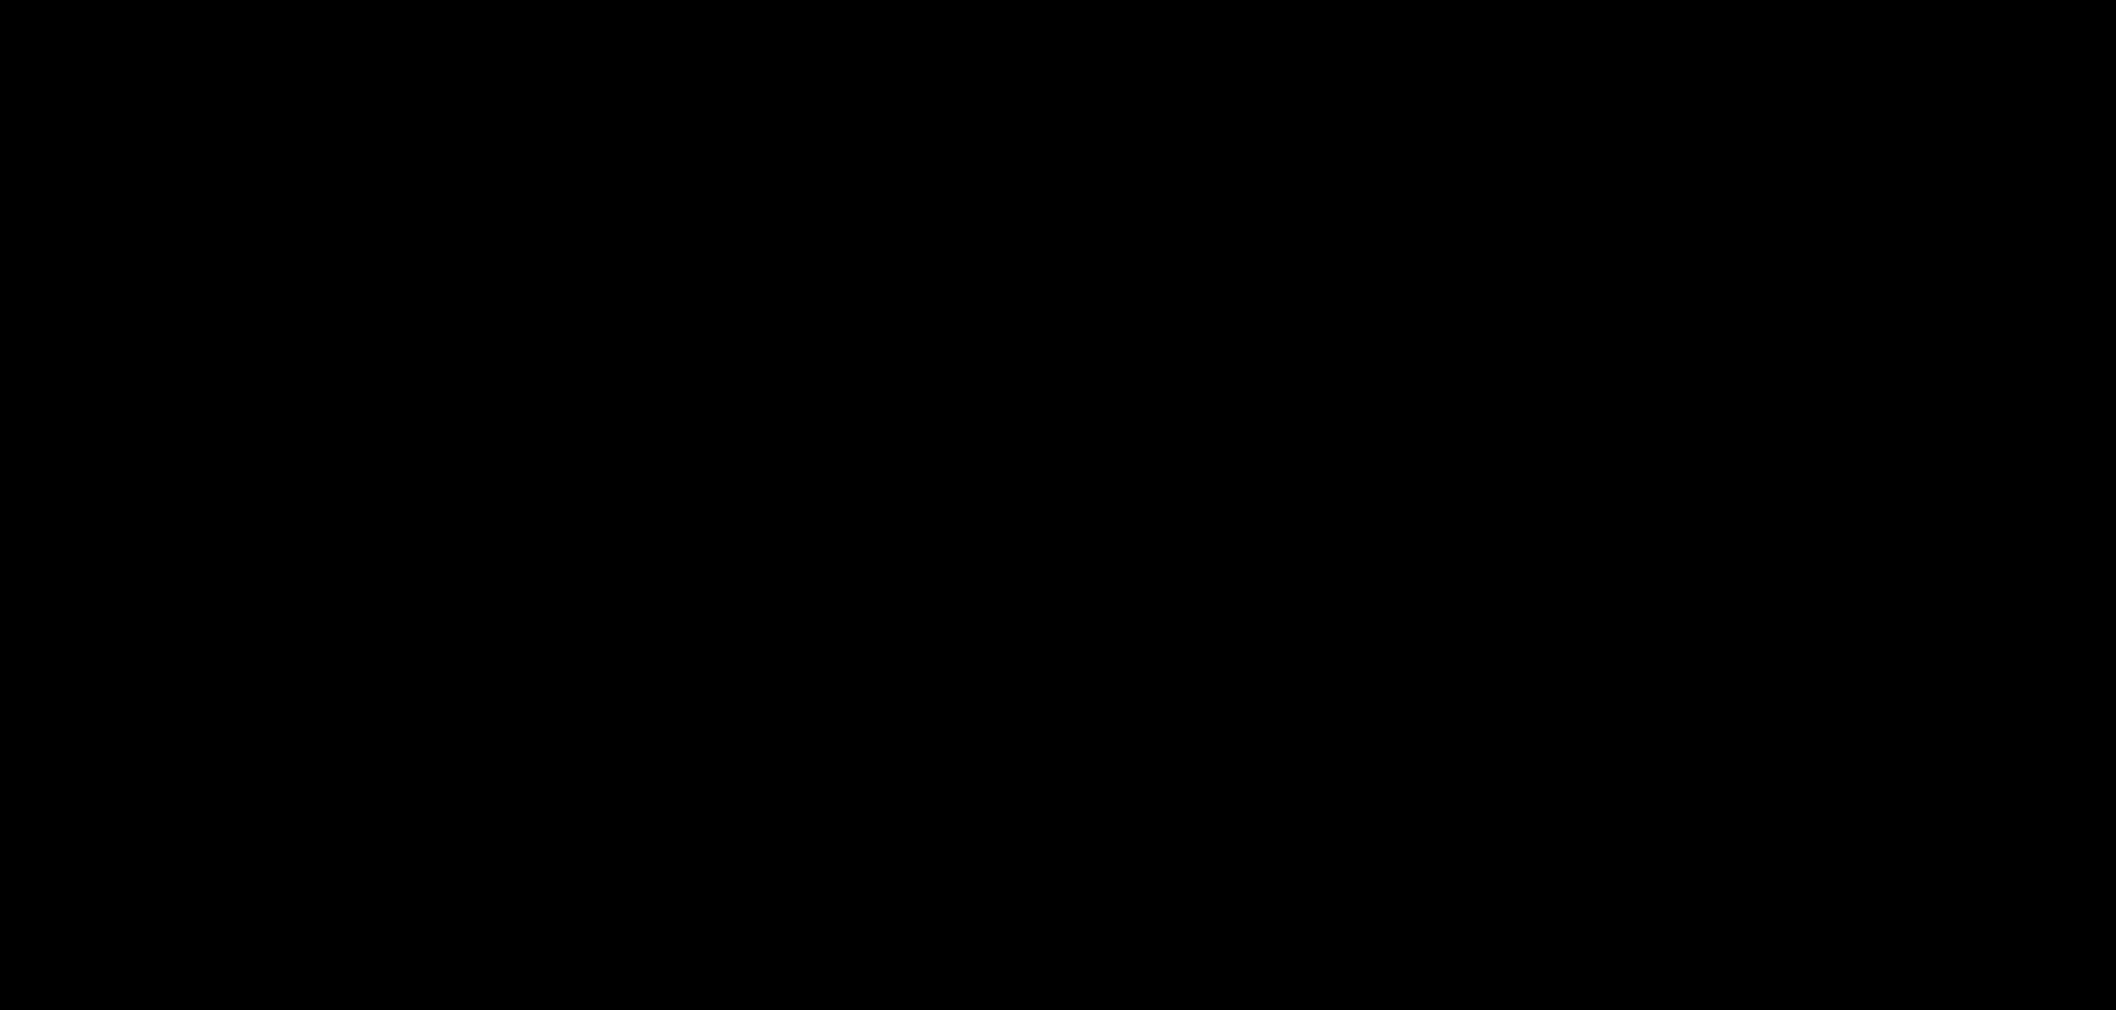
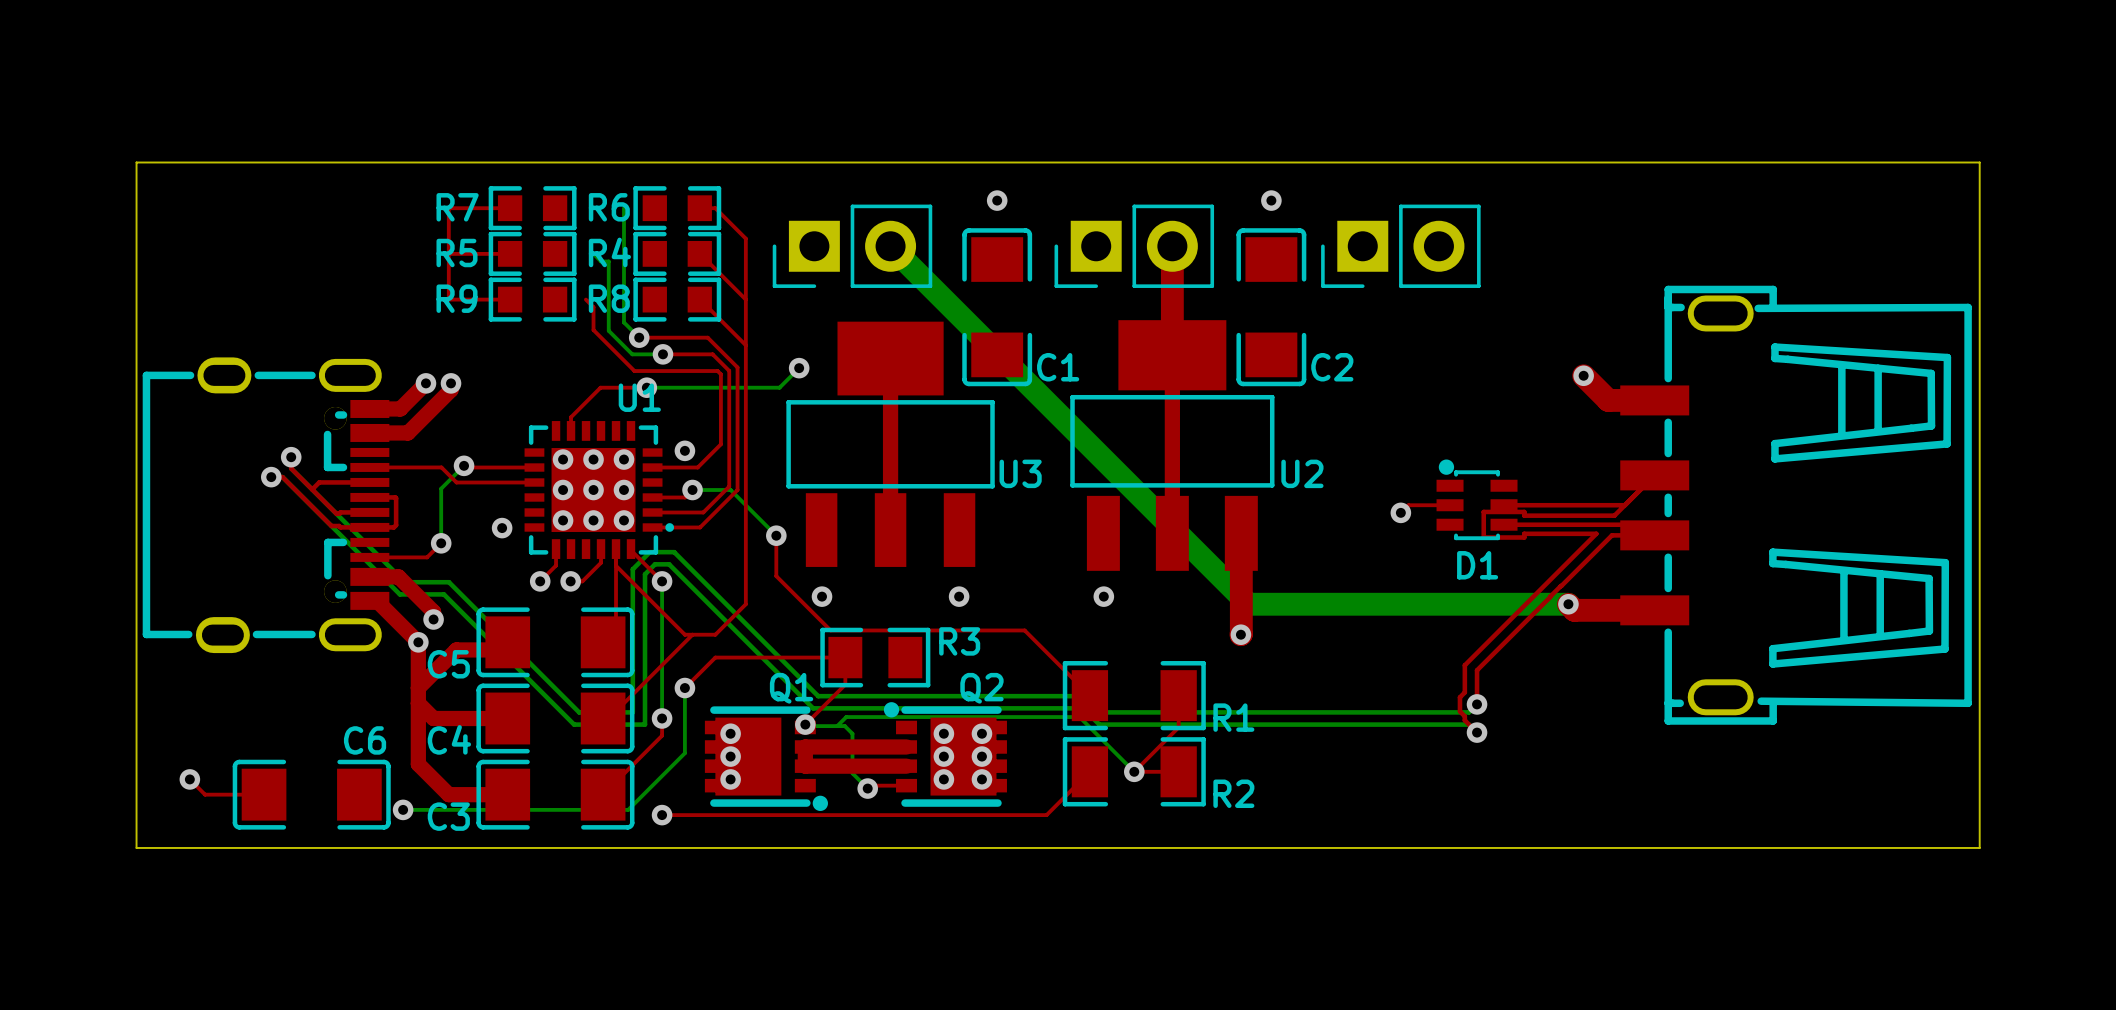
board edge: none -> (136, 162) (1979, 162) (1979, 847) (136, 847) (136, 162)
via: none -> (997, 200)
via: none -> (1271, 200)
top track: none -> (510, 208) (448, 208) (448, 299) (510, 299)
R7: none -> (532, 208)
bottom track: none -> (623, 208) (623, 322) (639, 337)
R6: none -> (677, 208)
top track: none -> (699, 208) (715, 208) (745, 238) (745, 604) (715, 634) (684, 634) (616, 565)
part: none -> (852, 246)
bottom track: none -> (890, 246) (1248, 604) (1568, 604)
part: none -> (1134, 246)
top track: none -> (1172, 246) (1172, 533)
part: none -> (1400, 246)
top track: none -> (448, 253) (510, 253)
R5: none -> (532, 253)
bottom track: none -> (593, 253) (601, 261) (608, 261) (608, 330) (632, 354) (662, 354)
R4: none -> (677, 253)
top track: none -> (700, 253) (745, 299)
R9: none -> (532, 299)
top track: none -> (585, 299) (593, 307) (593, 330) (634, 371) (717, 371) (720, 374) (720, 444) (697, 467) (652, 467)
R8: none -> (677, 299)
top track: none -> (700, 299) (745, 345)
C1: none -> (997, 307)
C2: none -> (1271, 307)
top track: none -> (639, 337) (707, 337) (737, 367) (737, 490) (700, 527) (652, 527)
via: none -> (639, 337)
top track: none -> (662, 354) (712, 354) (729, 370) (729, 486) (703, 512) (652, 512)
via: none -> (662, 354)
top track: none -> (890, 358) (890, 530)
bottom track: none -> (799, 368) (779, 387) (646, 387)
via: none -> (799, 368)
top track: none -> (1583, 375) (1608, 400) (1654, 400)
via: none -> (1583, 375)
top track: none -> (425, 383) (400, 408) (369, 408)
via: none -> (425, 383)
top track: none -> (451, 383) (451, 390) (408, 432) (369, 432)
via: none -> (451, 383)
top track: none -> (646, 387) (600, 387) (571, 417) (571, 430)
via: none -> (646, 387)
U3: none -> (890, 444)
U2: none -> (1172, 445)
via: none -> (684, 450)
top track: none -> (291, 457) (291, 468) (336, 513) (369, 512)
bottom track: none -> (291, 457) (291, 468) (404, 582) (449, 582) (579, 712) (632, 712) (632, 569) (649, 552) (674, 552) (818, 696) (1088, 696) (1104, 712) (1469, 712) (1477, 704)
via: none -> (291, 457)
via: none -> (563, 459)
via: none -> (593, 459)
via: none -> (623, 459)
top track: none -> (464, 465) (465, 467) (534, 467)
bottom track: none -> (464, 465) (441, 488) (441, 543)
via: none -> (464, 465)
top track: none -> (369, 467) (441, 467) (456, 482) (534, 482)
top track: none -> (1654, 475) (1614, 515) (1524, 515) (1524, 511) (1483, 511) (1483, 537) (1524, 537) (1524, 533) (1596, 533) (1464, 665) (1464, 692) (1459, 697) (1459, 711) (1464, 716) (1464, 720) (1477, 732)
top track: none -> (271, 477) (282, 477) (331, 526) (393, 527) (396, 525) (396, 498) (369, 497)
bottom track: none -> (271, 477) (282, 477) (399, 594) (443, 594) (574, 724) (645, 724) (645, 574) (655, 564) (669, 564) (813, 708) (1083, 708) (1099, 724) (1469, 724) (1477, 732)
via: none -> (271, 477)
top track: none -> (369, 482) (319, 482) (312, 489)
via: none -> (563, 490)
via: none -> (593, 490)
U1: none -> (599, 490)
via: none -> (623, 490)
top track: none -> (692, 490) (685, 497) (652, 497)
bottom track: none -> (692, 490) (730, 490) (776, 535)
via: none -> (692, 490)
D1: none -> (1477, 499)
part: none -> (266, 505)
top track: none -> (1450, 505) (1408, 505) (1400, 512)
top track: none -> (1504, 505) (1624, 505)
part: none -> (1796, 505)
via: none -> (1400, 512)
via: none -> (563, 520)
via: none -> (593, 520)
via: none -> (623, 520)
top track: none -> (1504, 524) (1644, 524) (1654, 535) (1612, 535) (1561, 586)
via: none -> (502, 528)
top track: none -> (1241, 533) (1241, 634)
top track: none -> (776, 535) (776, 576) (830, 630) (1024, 630) (1089, 695)
via: none -> (776, 535)
top track: none -> (441, 543) (427, 557) (369, 557)
via: none -> (441, 543)
top track: none -> (556, 549) (556, 565) (540, 581)
top track: none -> (601, 549) (601, 562) (582, 581) (570, 581)
top track: none -> (616, 549) (616, 629) (603, 642)
top track: none -> (631, 549) (662, 581)
top track: none -> (369, 576) (398, 576) (433, 611) (433, 619)
via: none -> (540, 581)
via: none -> (570, 581)
bottom track: none -> (662, 581) (662, 718)
via: none -> (662, 581)
top track: none -> (1560, 586) (1550, 596)
via: none -> (822, 596)
via: none -> (959, 596)
via: none -> (1103, 596)
top track: none -> (1550, 597) (1477, 670) (1477, 704)
top track: none -> (369, 600) (376, 600) (418, 642) (418, 764) (448, 794) (507, 794)
top track: none -> (1568, 604) (1574, 610) (1654, 610)
via: none -> (1568, 604)
via: none -> (433, 619)
top track: none -> (692, 634) (608, 718) (603, 718)
via: none -> (1240, 634)
via: none -> (418, 642)
top track: none -> (507, 642) (500, 649) (456, 649) (418, 688)
C5: none -> (555, 642)
R3: none -> (875, 657)
top track: none -> (684, 688) (715, 657) (845, 657) (845, 684) (805, 724)
bottom track: none -> (684, 688) (684, 753) (628, 809) (403, 809)
via: none -> (684, 688)
R1: none -> (1134, 695)
top track: none -> (1178, 695) (1178, 727) (1134, 771) (1178, 771)
top track: none -> (418, 703) (433, 718) (507, 718)
via: none -> (1477, 704)
C4: none -> (555, 718)
top track: none -> (662, 718) (662, 735) (603, 794)
via: none -> (662, 718)
bottom track: none -> (805, 724) (844, 726) (852, 733) (852, 773) (867, 788)
via: none -> (805, 724)
bottom track: none -> (837, 726) (846, 717) (1079, 717) (1134, 771)
via: none -> (1477, 732)
via: none -> (730, 733)
via: none -> (943, 733)
via: none -> (981, 733)
top track: none -> (906, 746) (805, 746) (805, 766) (906, 766)
Q2: none -> (945, 754)
via: none -> (730, 756)
via: none -> (943, 756)
via: none -> (981, 756)
Q1: none -> (766, 758)
top track: none -> (1089, 771) (1046, 815) (662, 815)
R2: none -> (1134, 771)
via: none -> (1134, 771)
top track: none -> (189, 779) (205, 794) (264, 794)
via: none -> (189, 779)
via: none -> (730, 779)
via: none -> (943, 779)
via: none -> (981, 779)
top track: none -> (906, 785) (870, 785) (867, 788)
via: none -> (867, 788)
C6: none -> (311, 794)
C3: none -> (555, 794)
via: none -> (403, 809)
via: none -> (662, 815)

